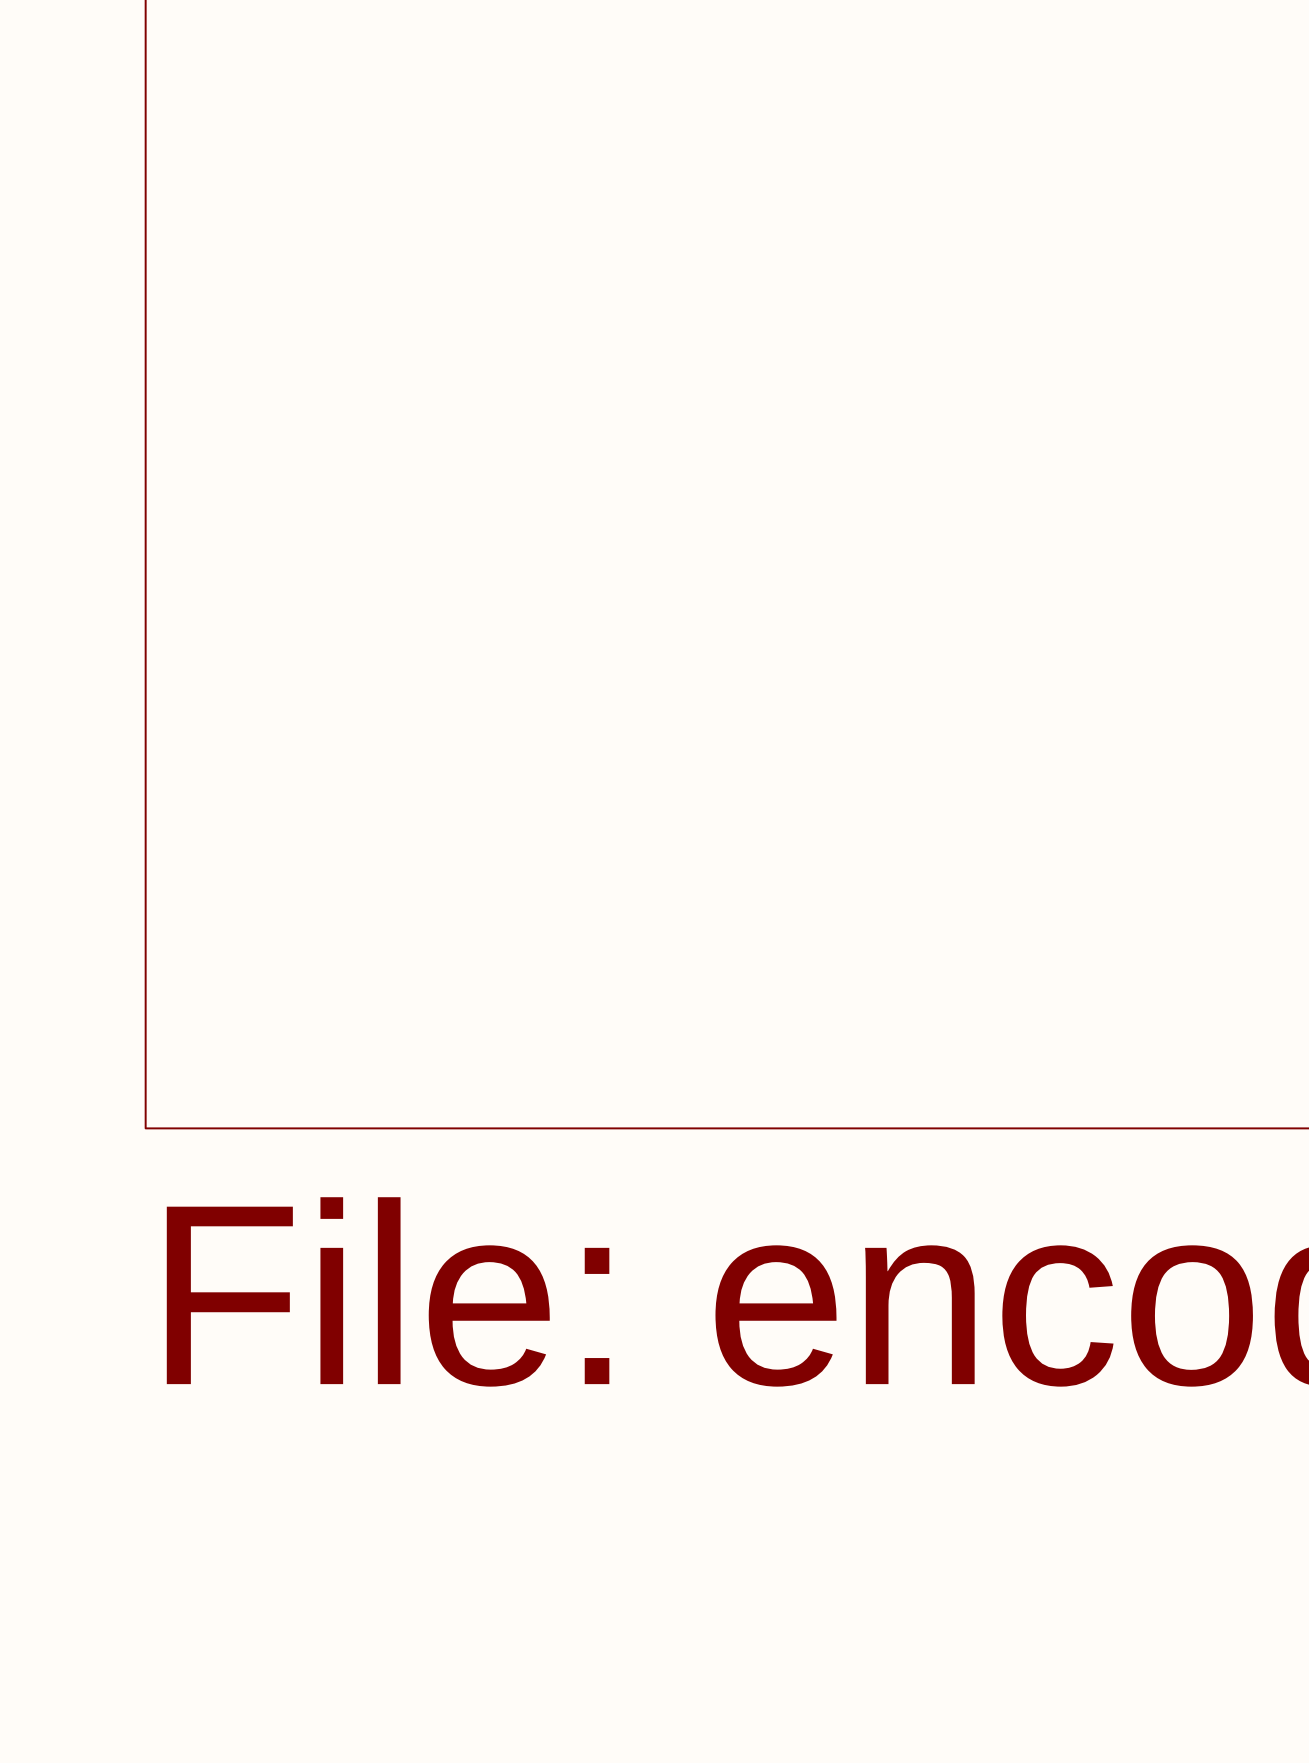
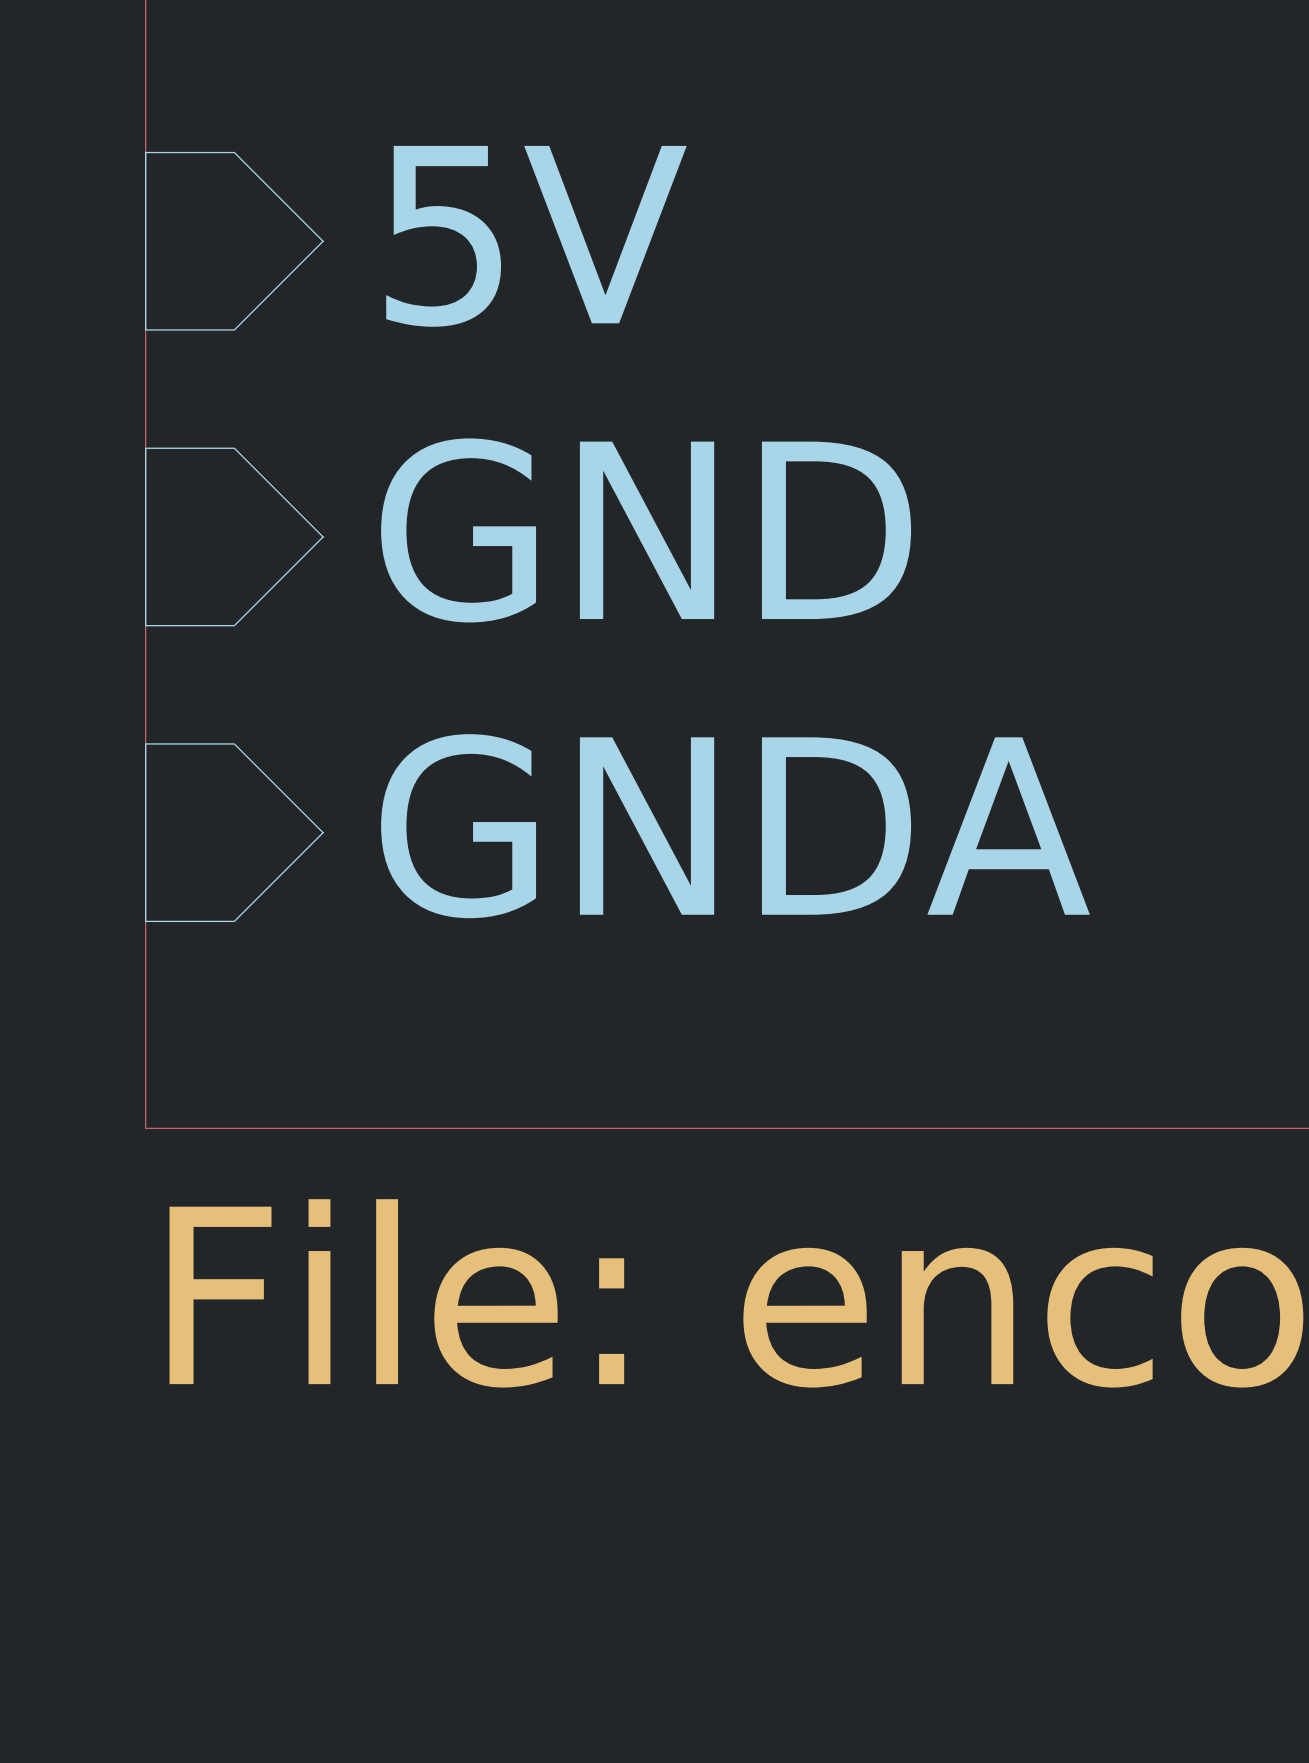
sheet pin: none -> 5V (536, 236)
sheet pin: none -> GND (646, 530)
sheet pin: none -> GNDA (735, 826)

